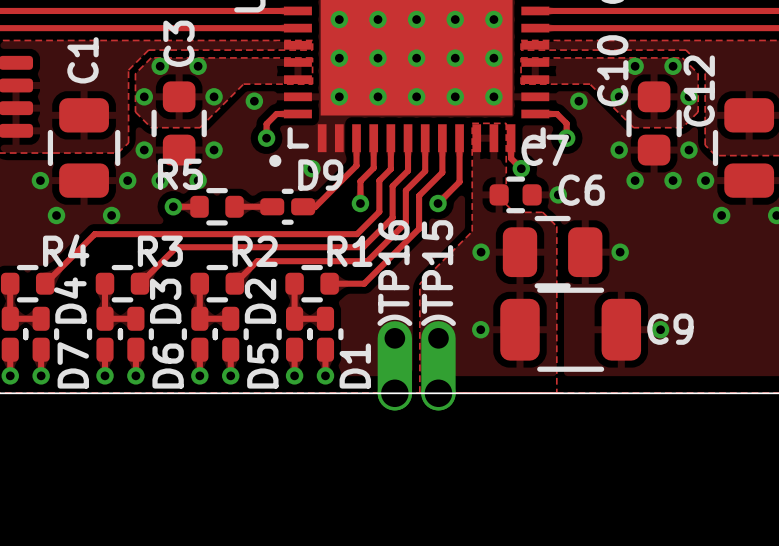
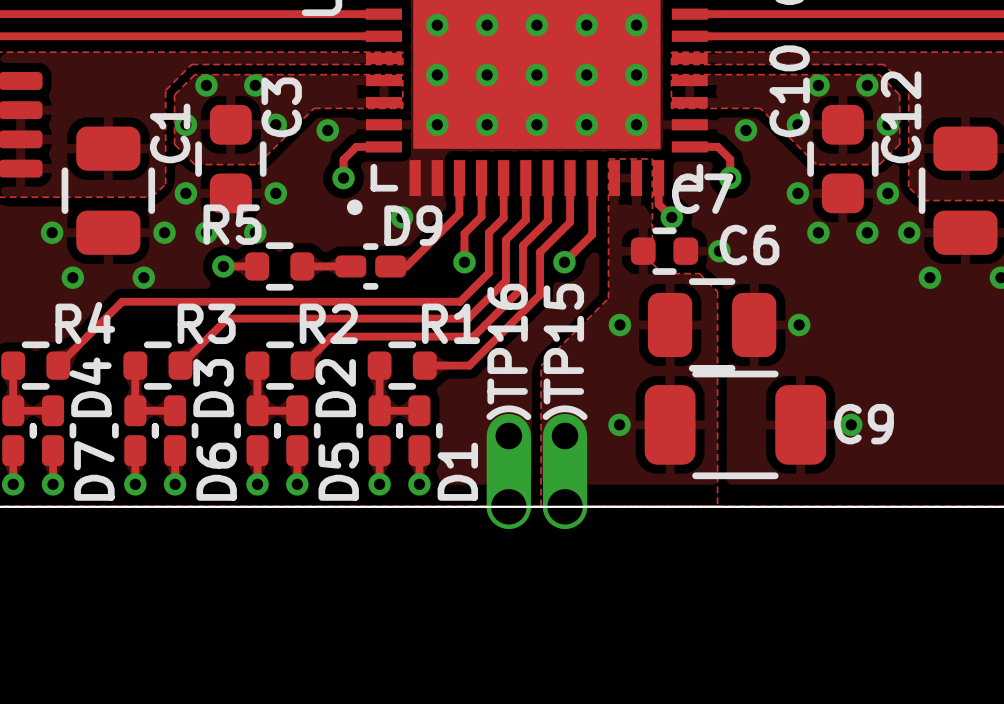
C3 name position: C3 (178, 43) -> C3 (281, 107)
C1 name position: C1 (83, 60) -> C1 (170, 133)

